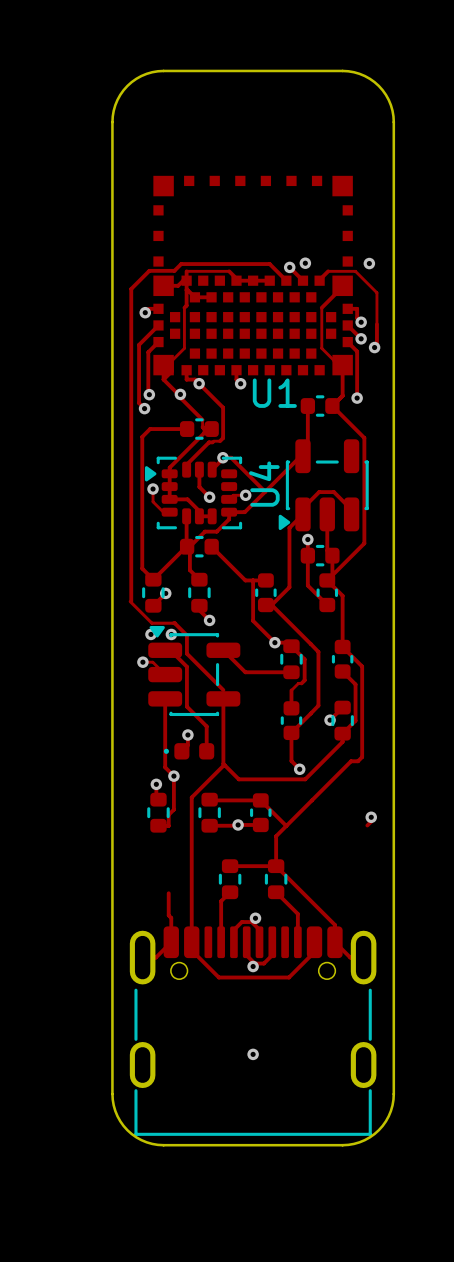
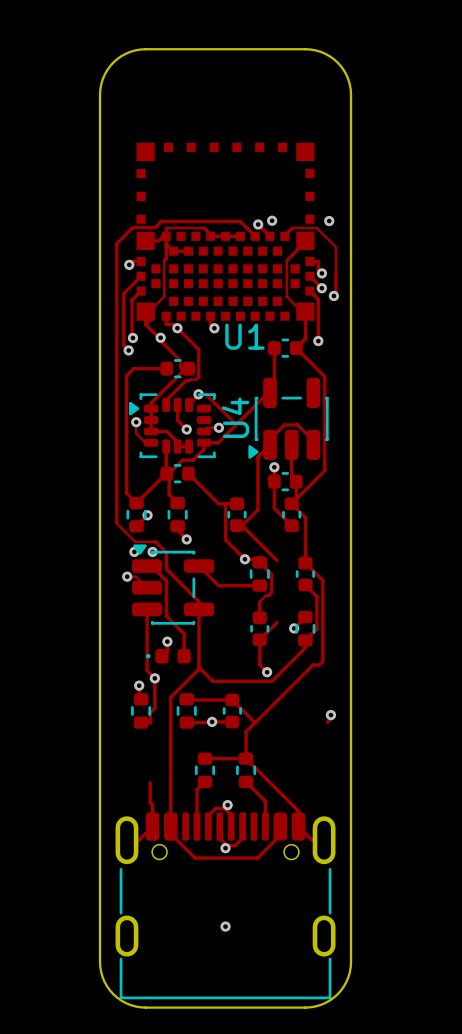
track: (310, 644) (318, 651) (318, 705) (310, 713) -> none

